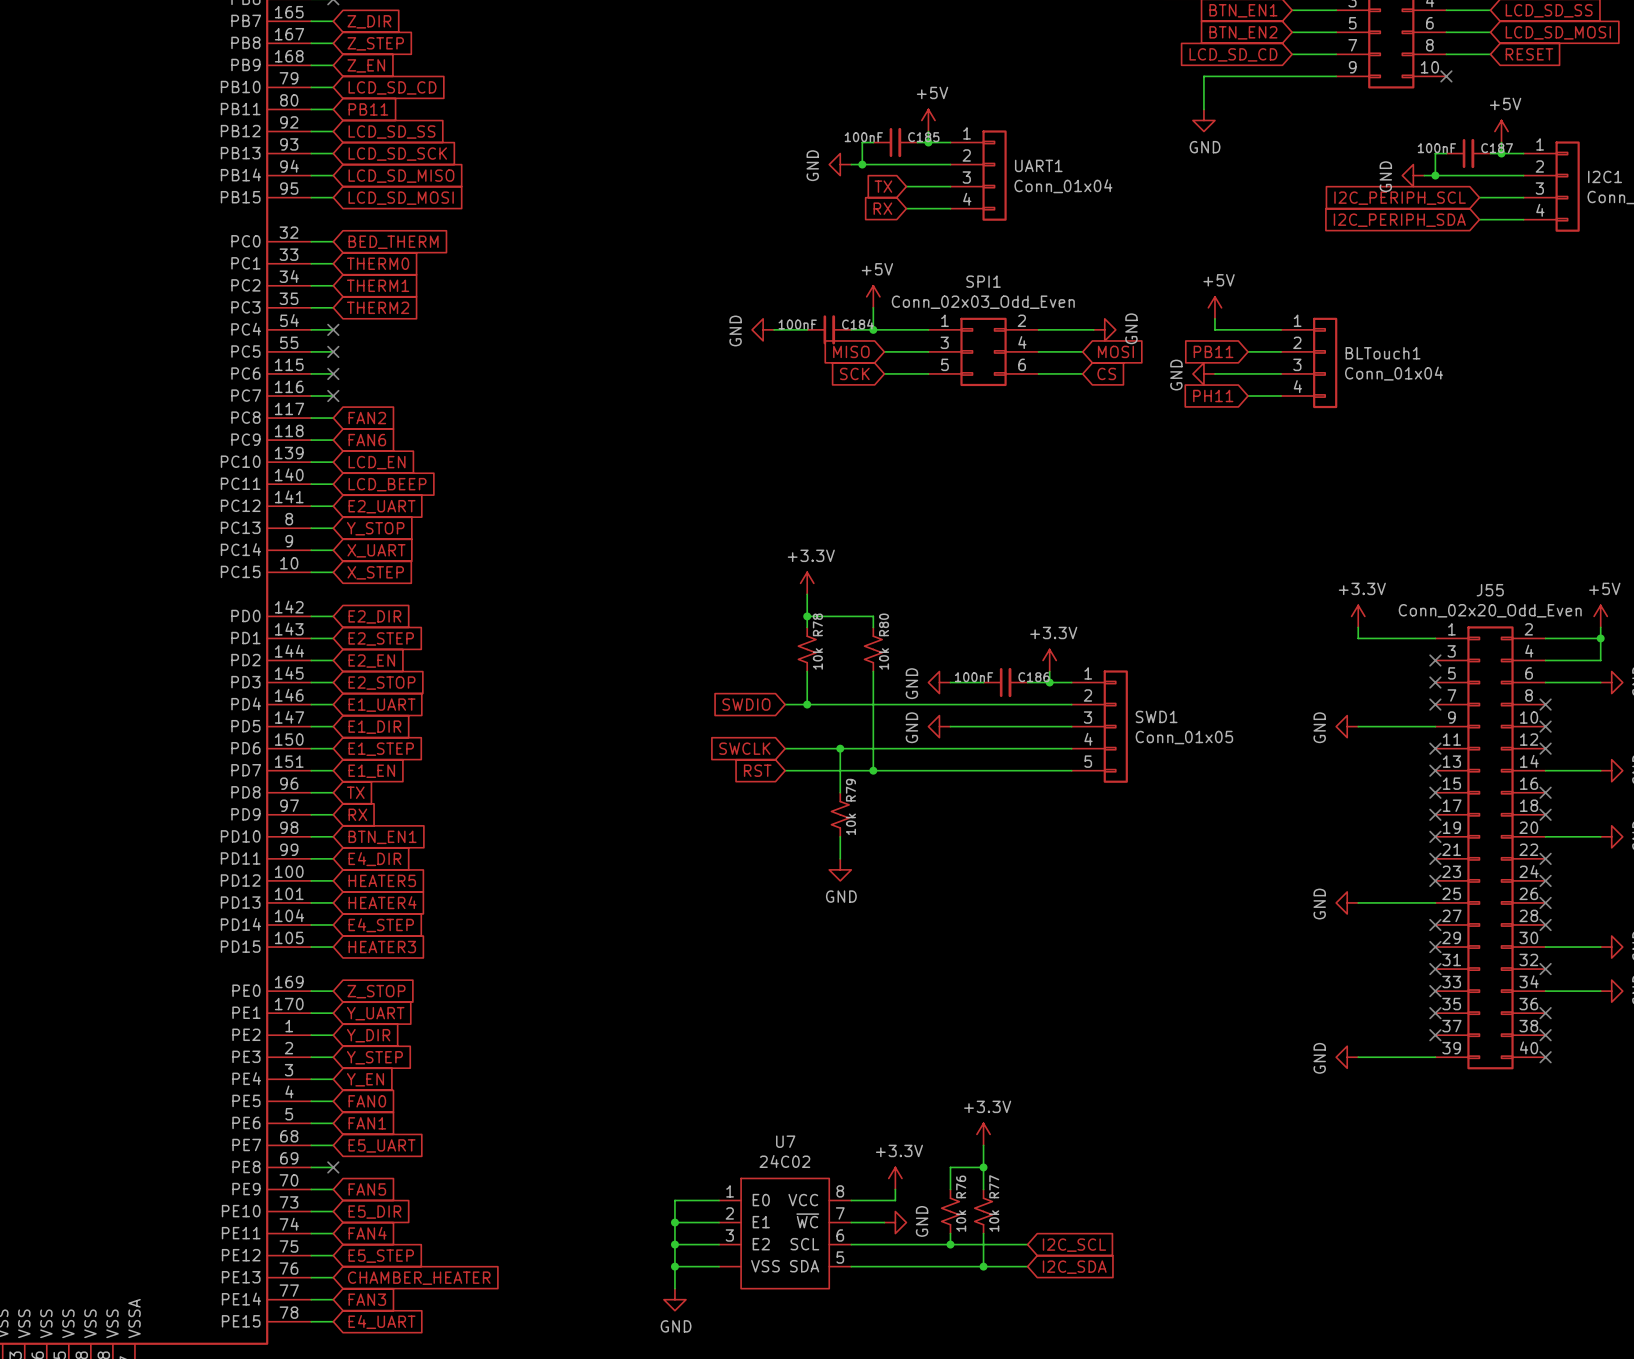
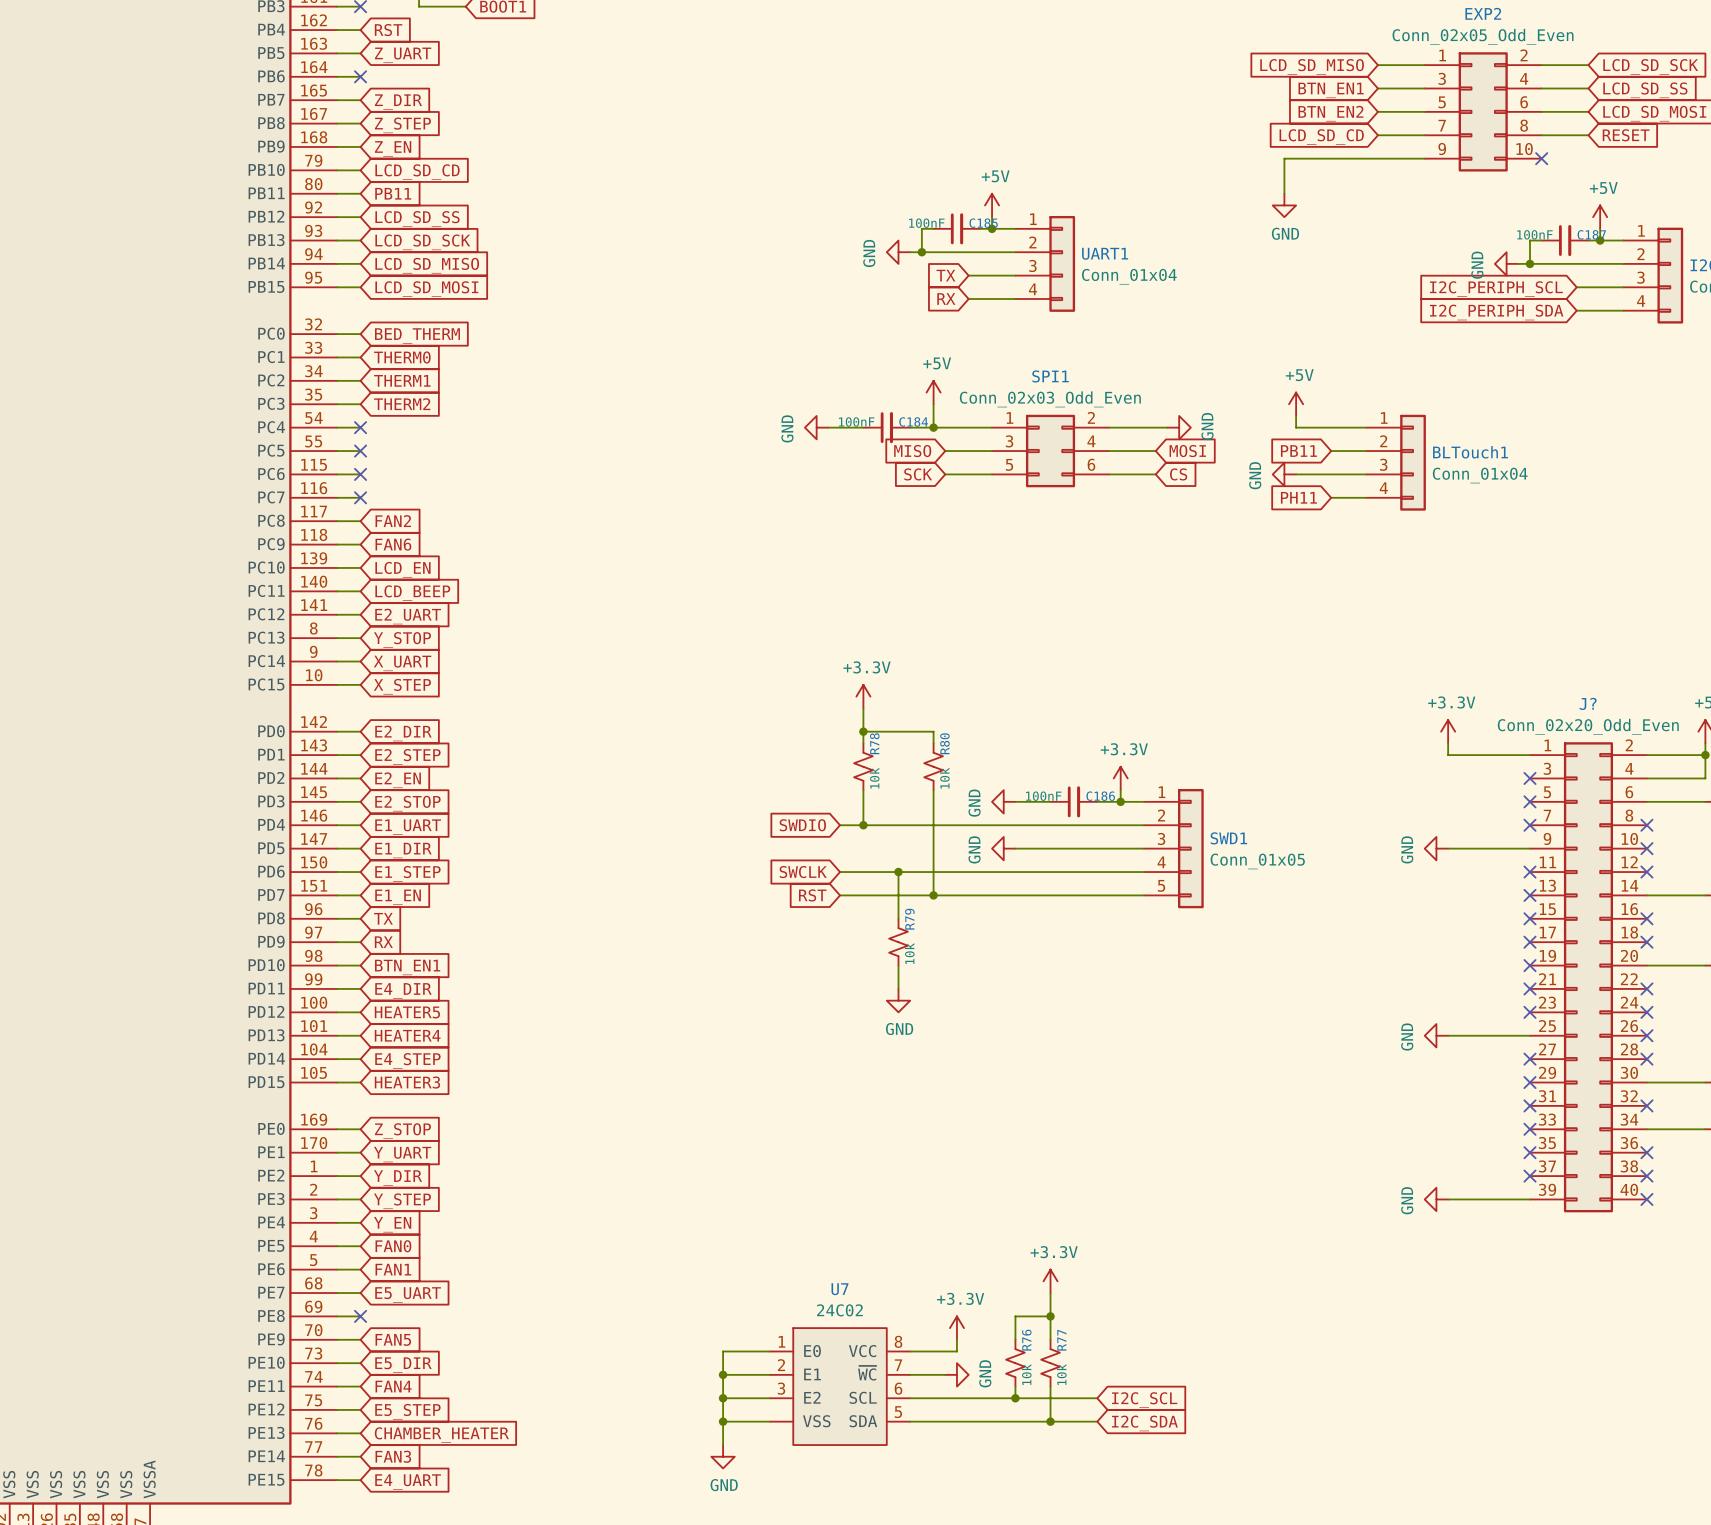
J55 name: J55 (1490, 590) -> J? (1588, 703)

